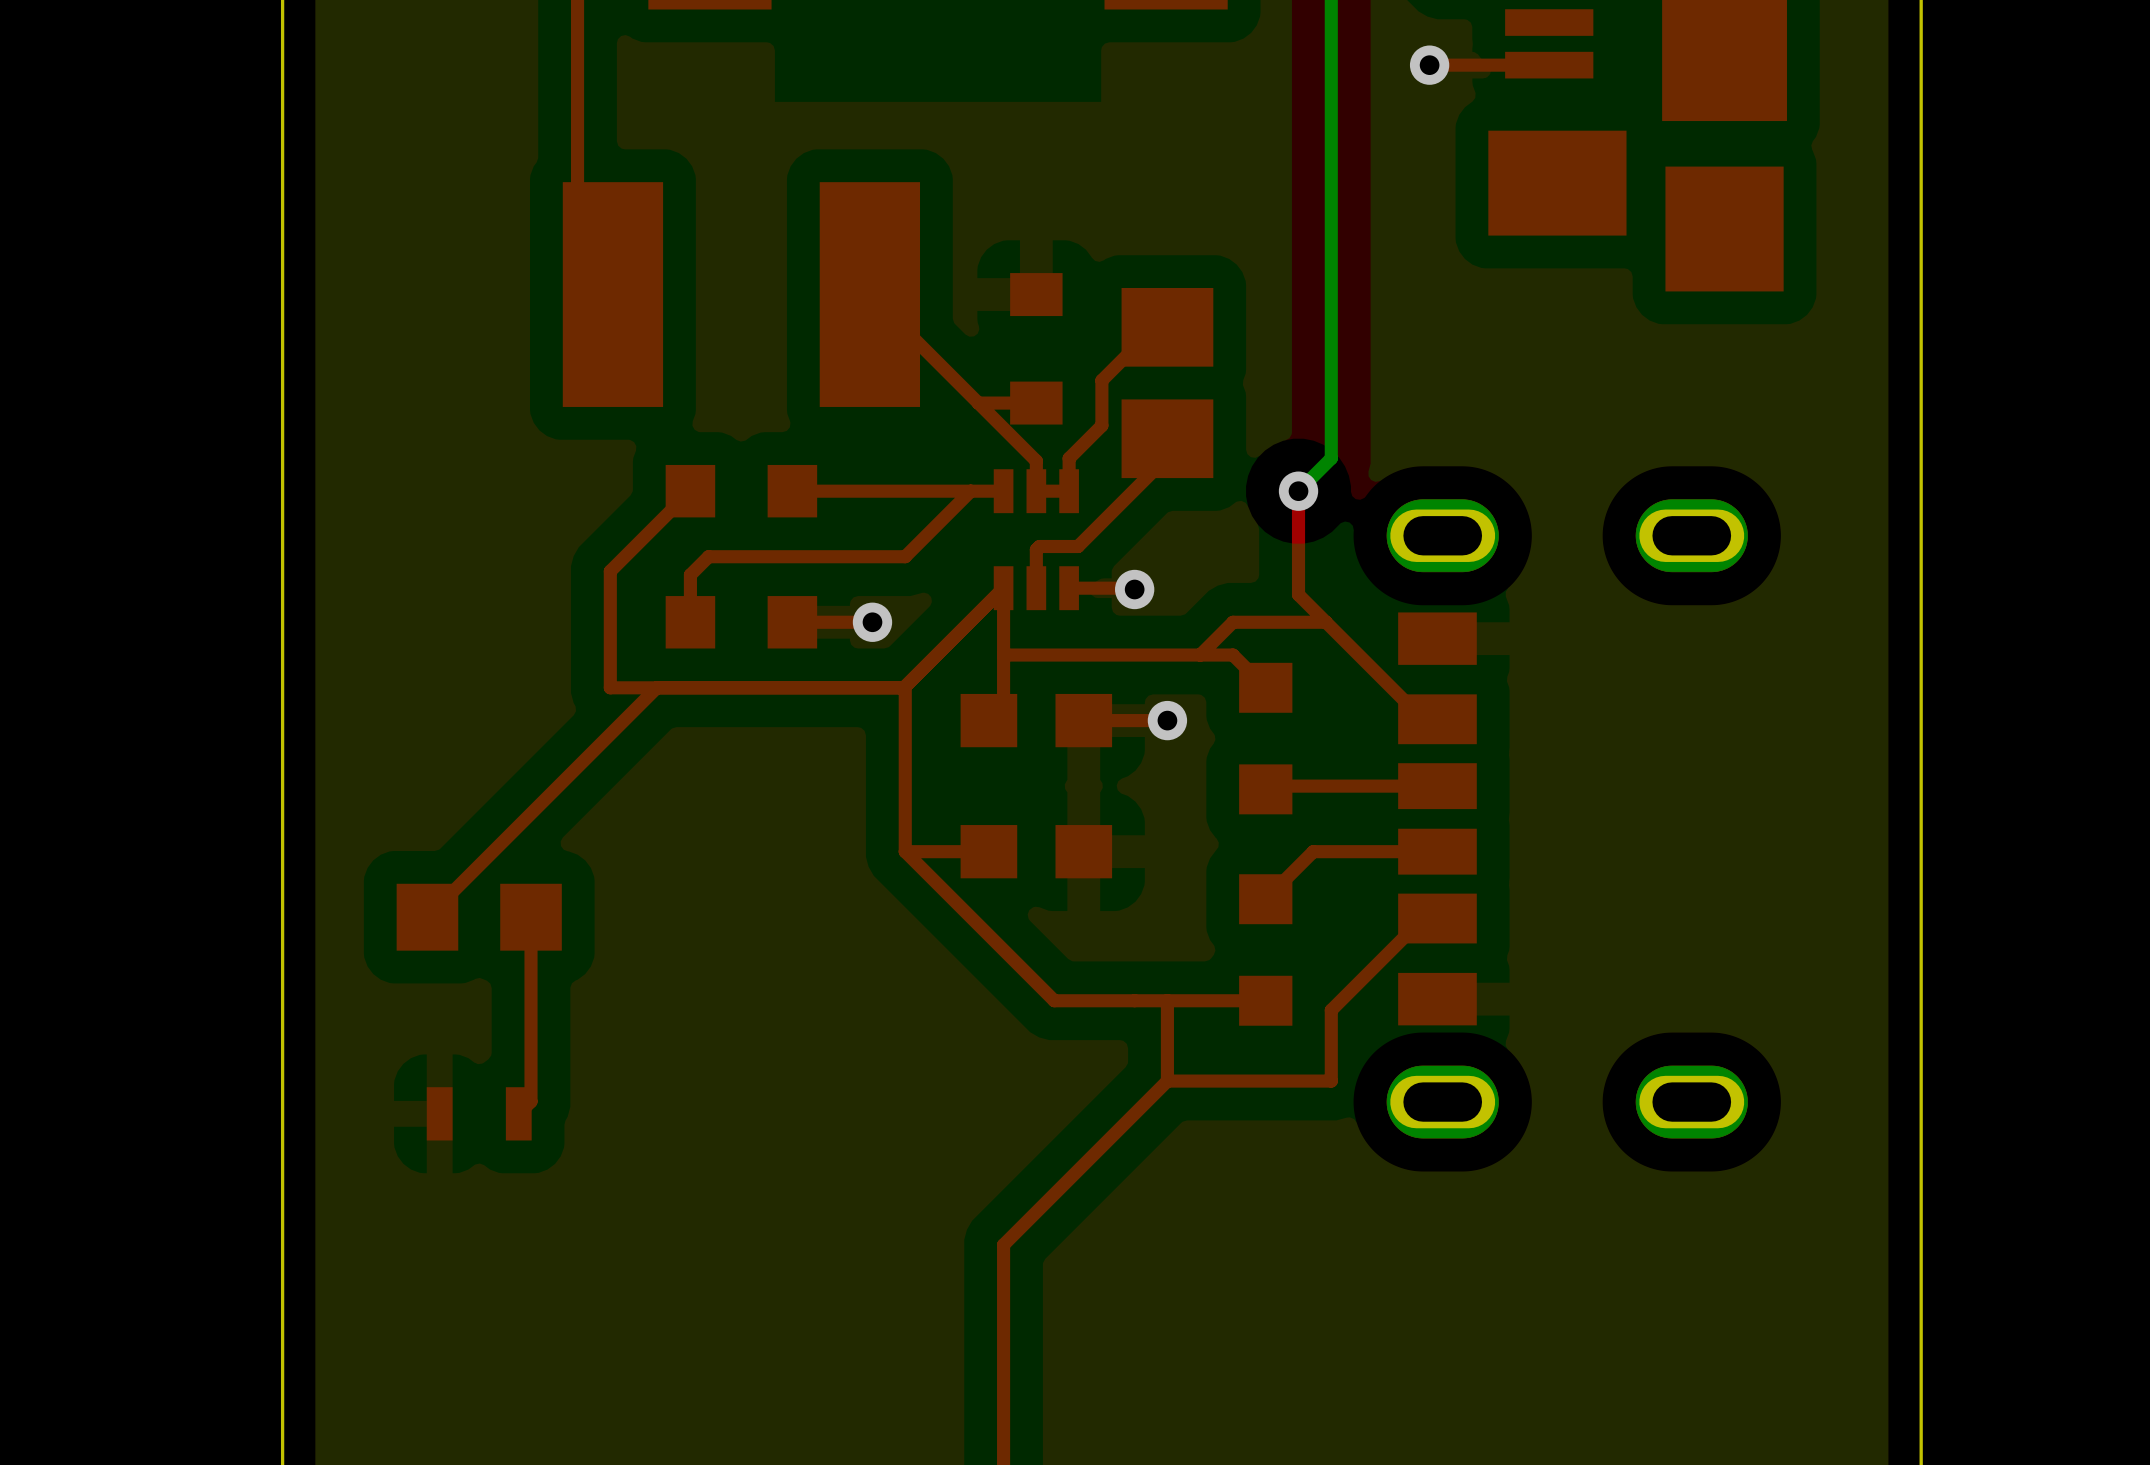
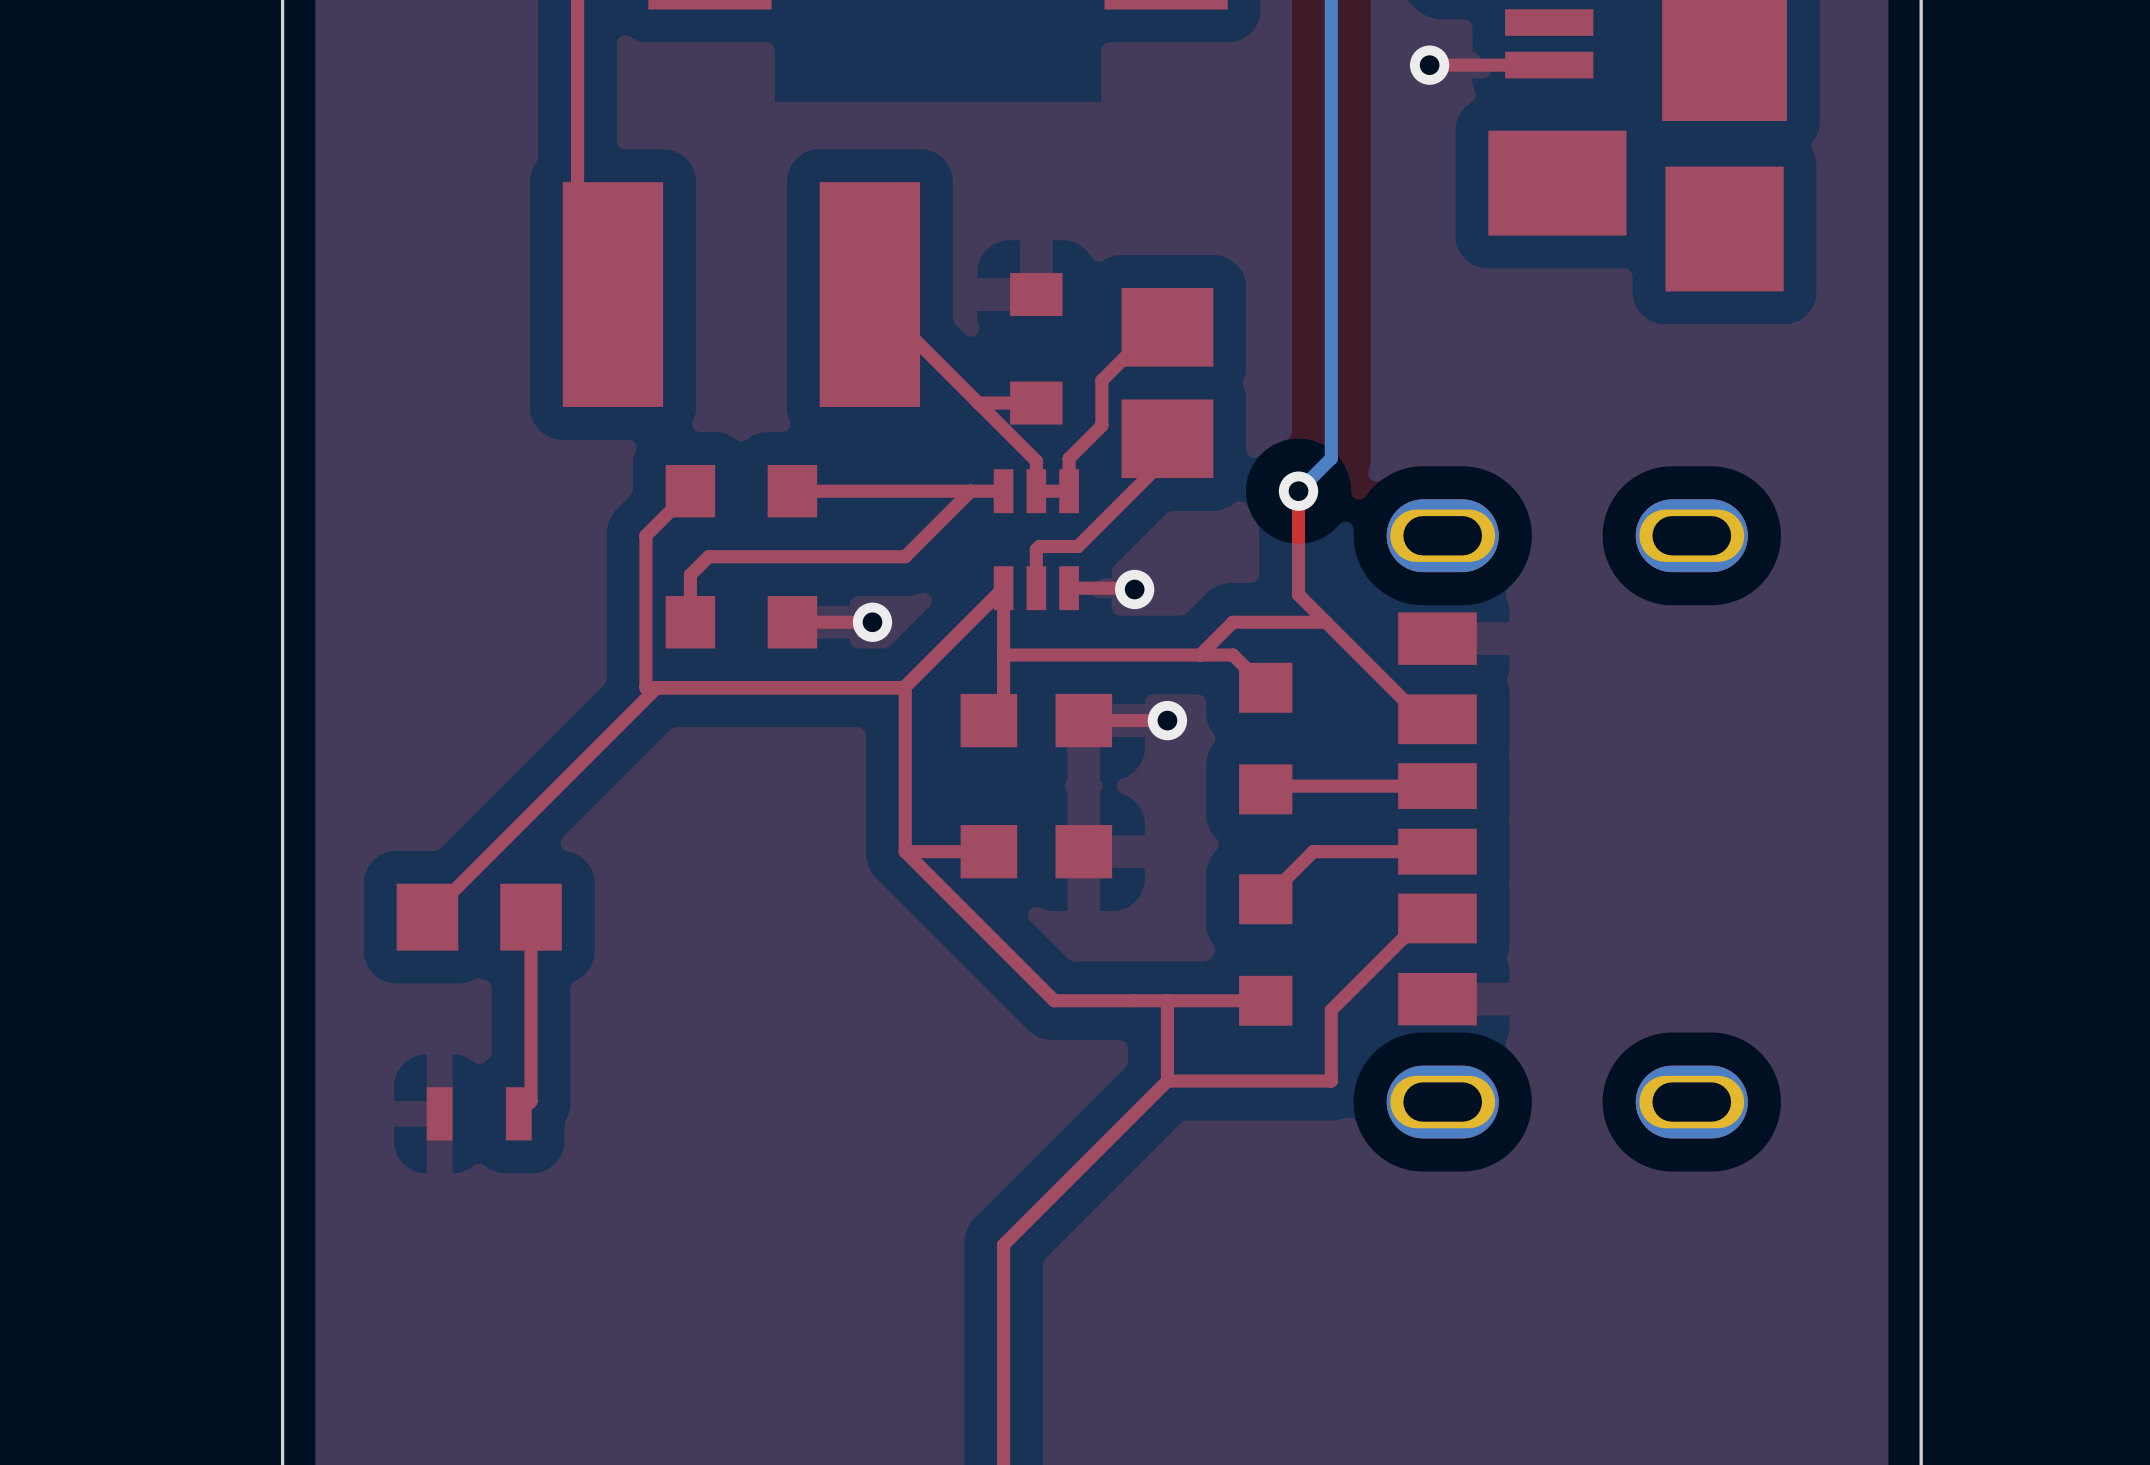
top track: (645, 535) (610, 571) (610, 687) (645, 687) -> (645, 535) (645, 687)

